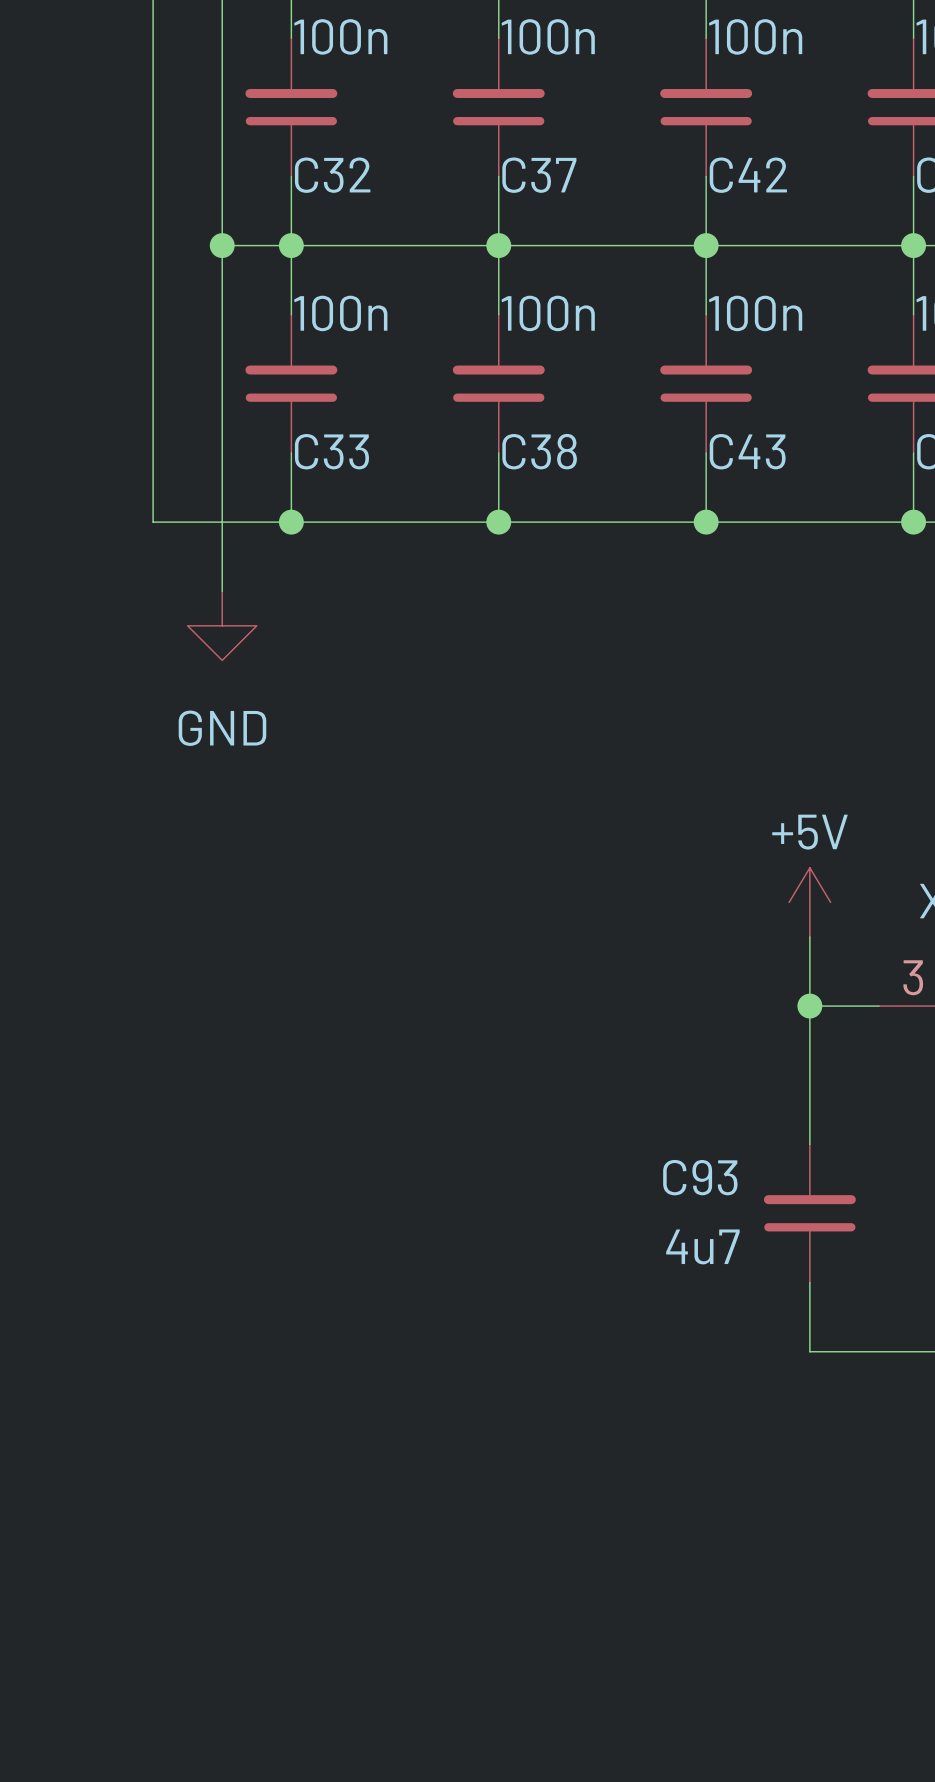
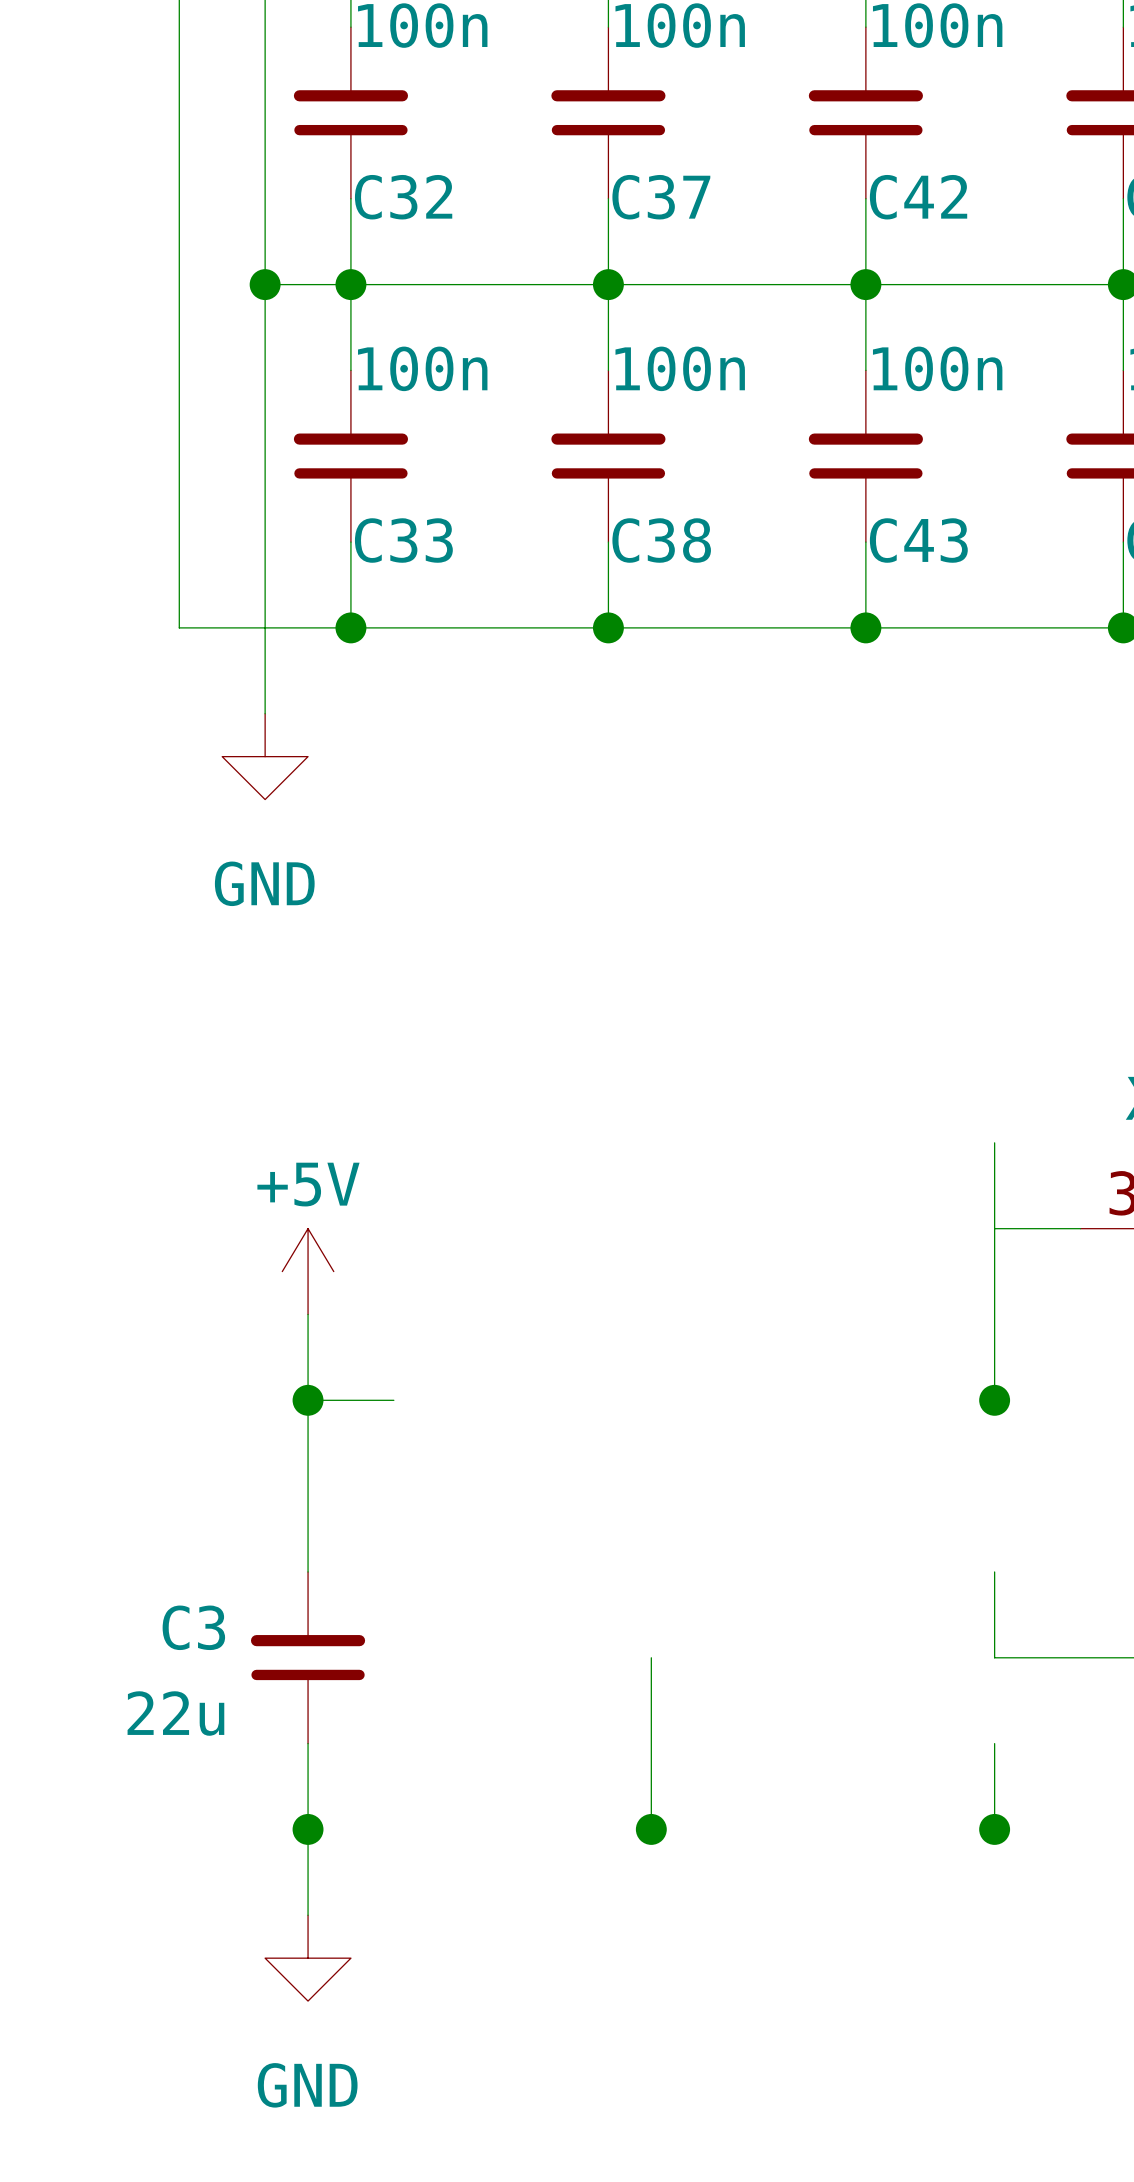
power symbol position: +5V (809, 902) -> +5V (308, 1271)
junction position: (809, 1006) -> (994, 1400)
wire: none -> (308, 1314) (308, 1571)
wire: none -> (308, 1400) (393, 1400)
junction: none -> (308, 1400)
C93: 4u7 (809, 1213) -> none
C3: none -> 22u (308, 1657)
wire: none -> (651, 1657) (651, 1829)
wire: none -> (308, 1743) (308, 1915)
wire: none -> (994, 1743) (994, 1829)
junction: none -> (308, 1829)
junction: none -> (651, 1829)
junction: none -> (994, 1829)
power symbol: none -> GND (308, 1958)

